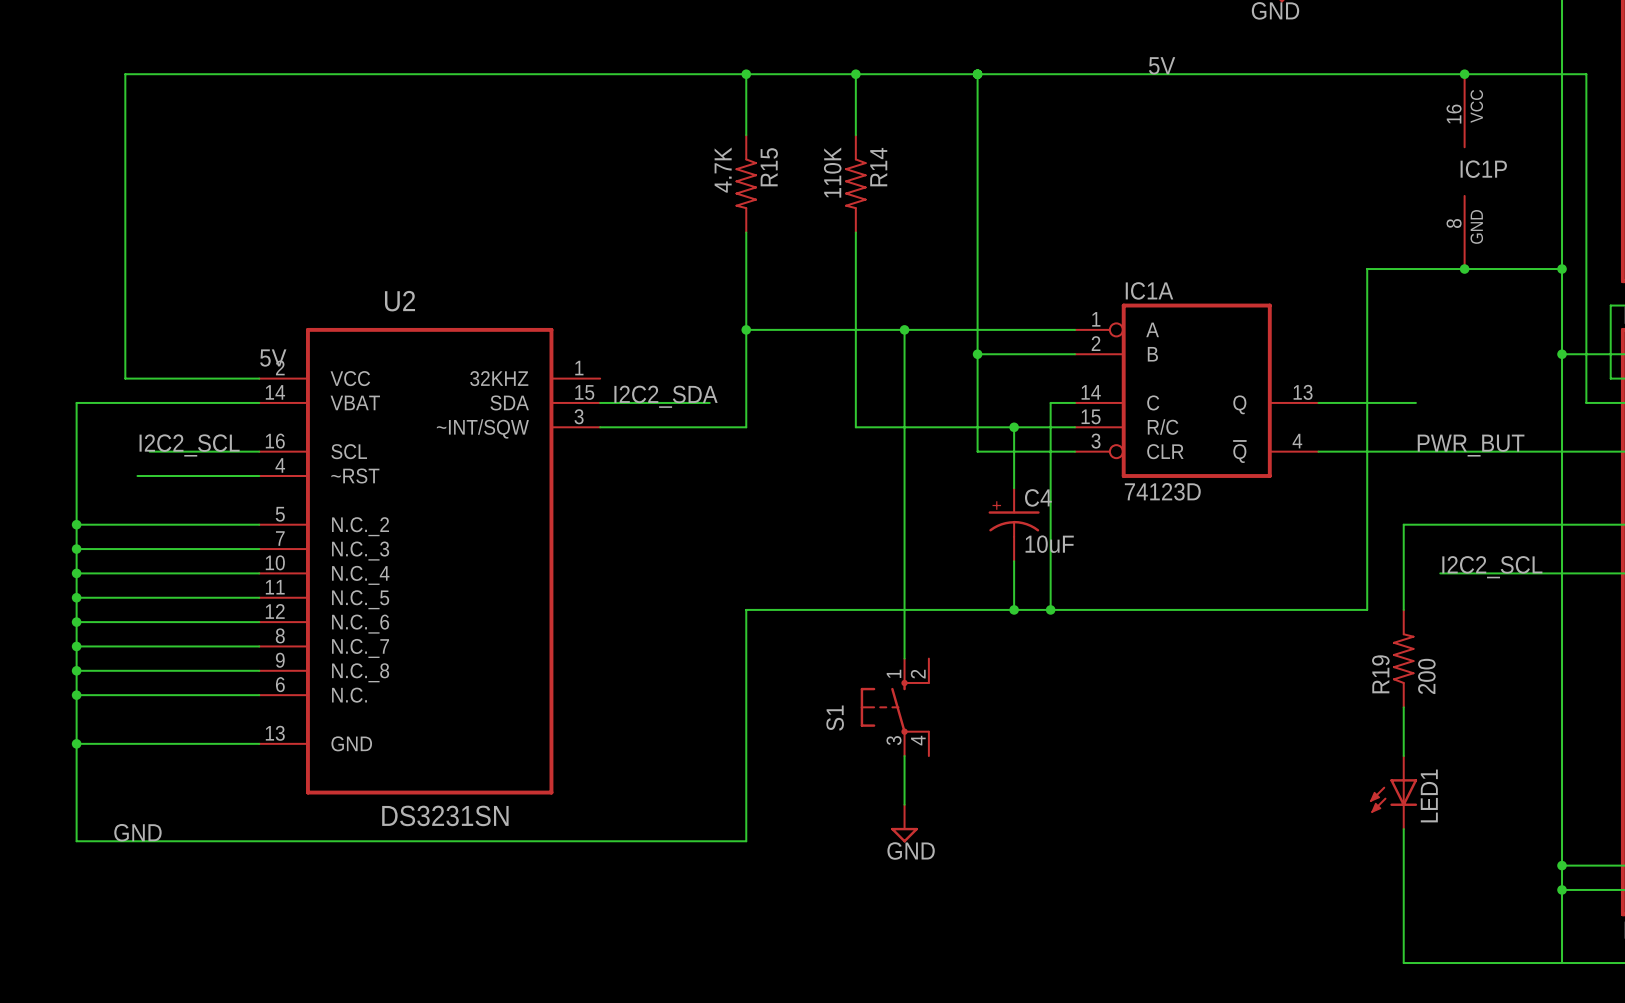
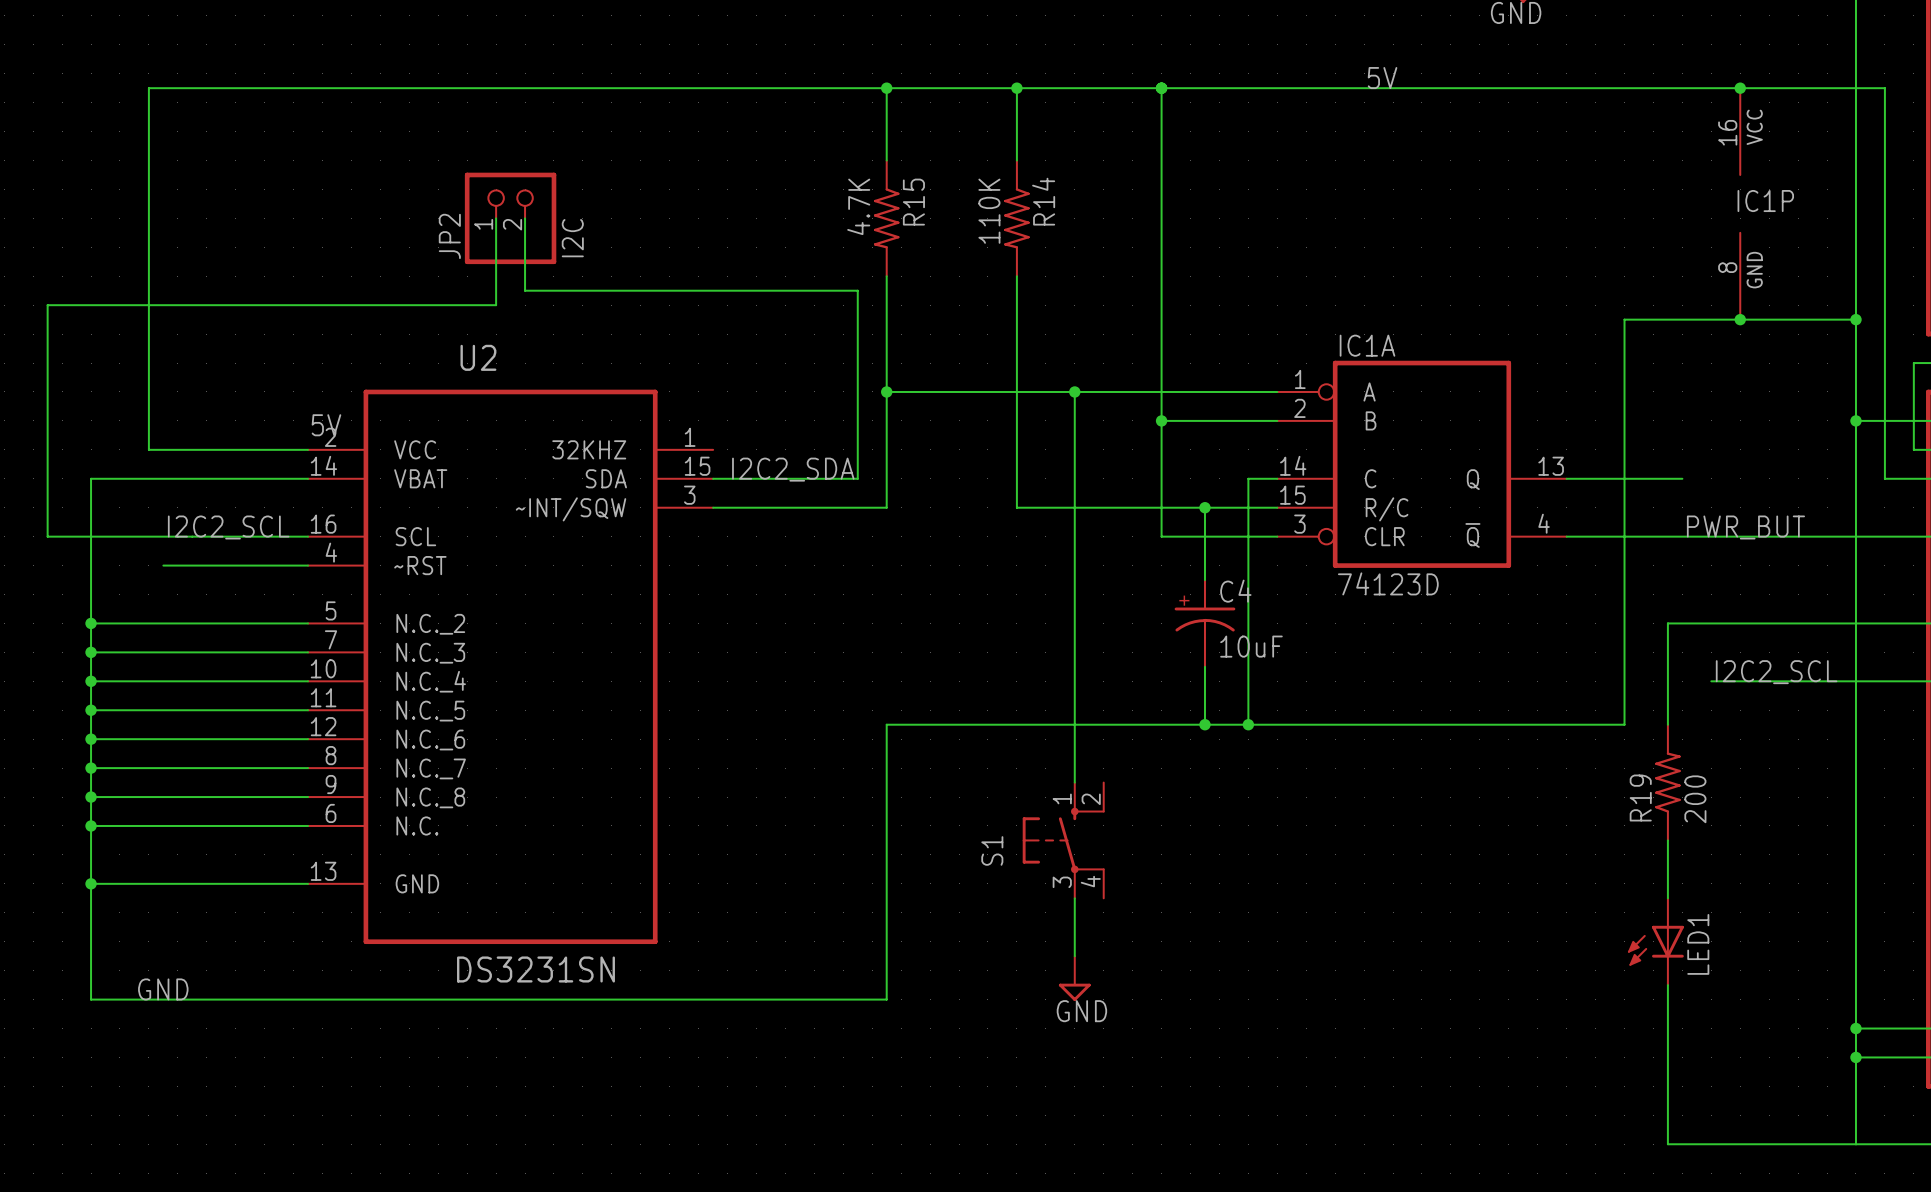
wire: none -> (496, 218) (496, 305) (47, 305) (47, 536) (177, 536)
JP2: none -> I2C (510, 218)
wire: none -> (525, 218) (525, 290) (857, 290) (857, 478) (843, 478)

